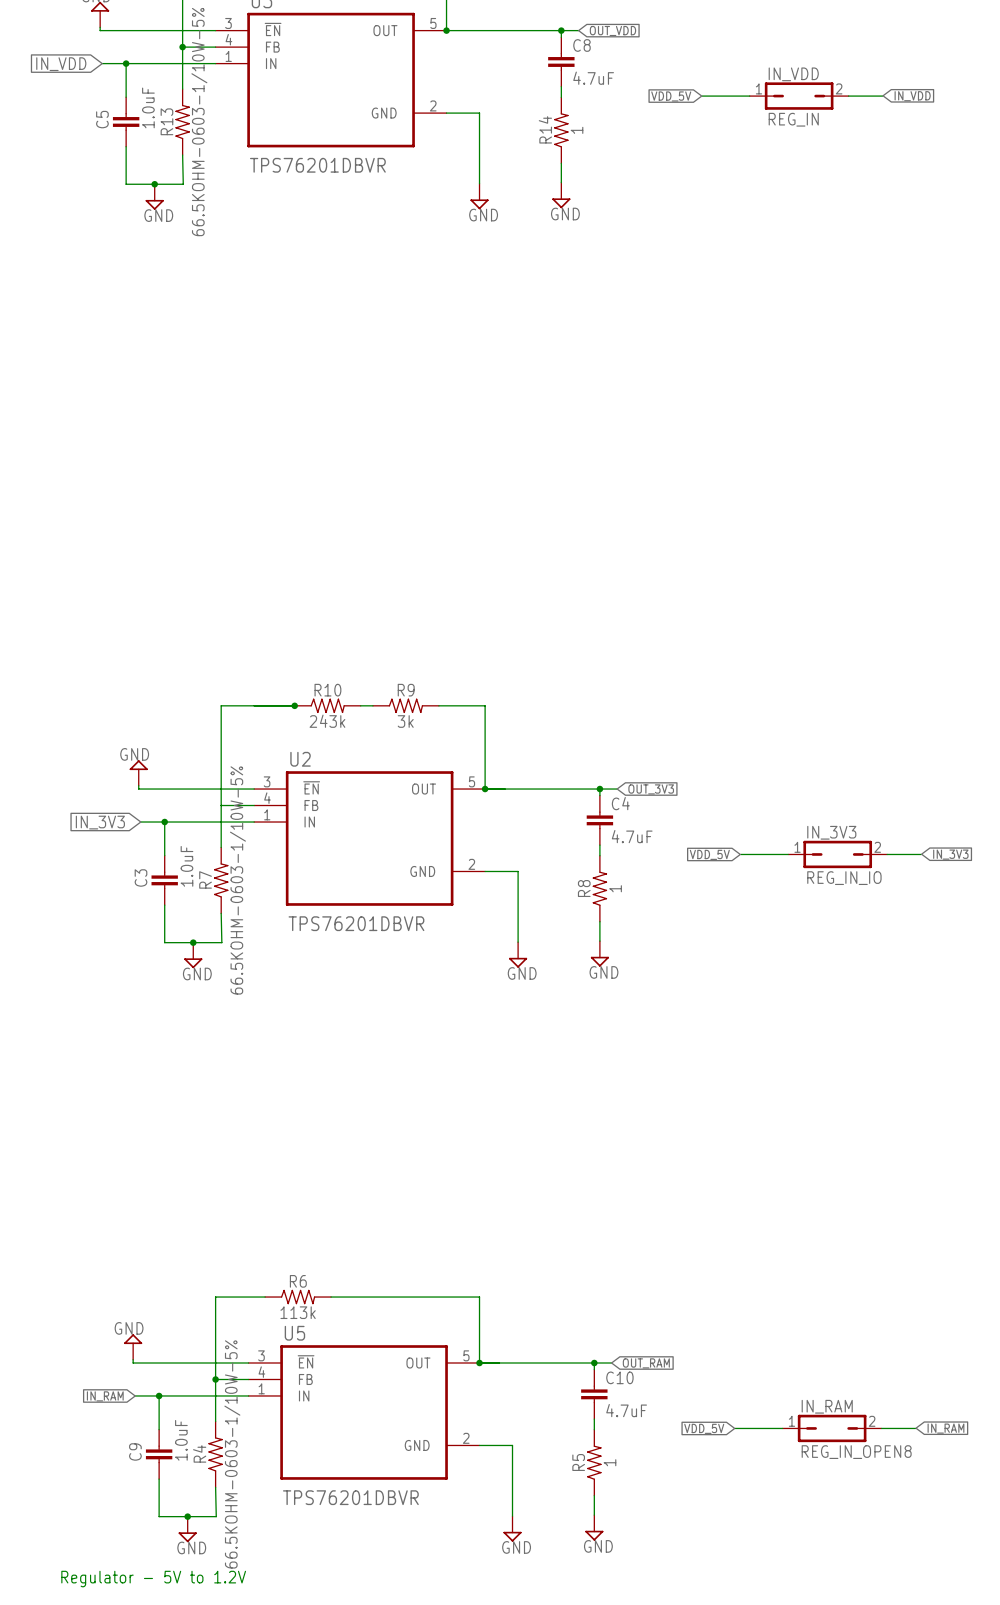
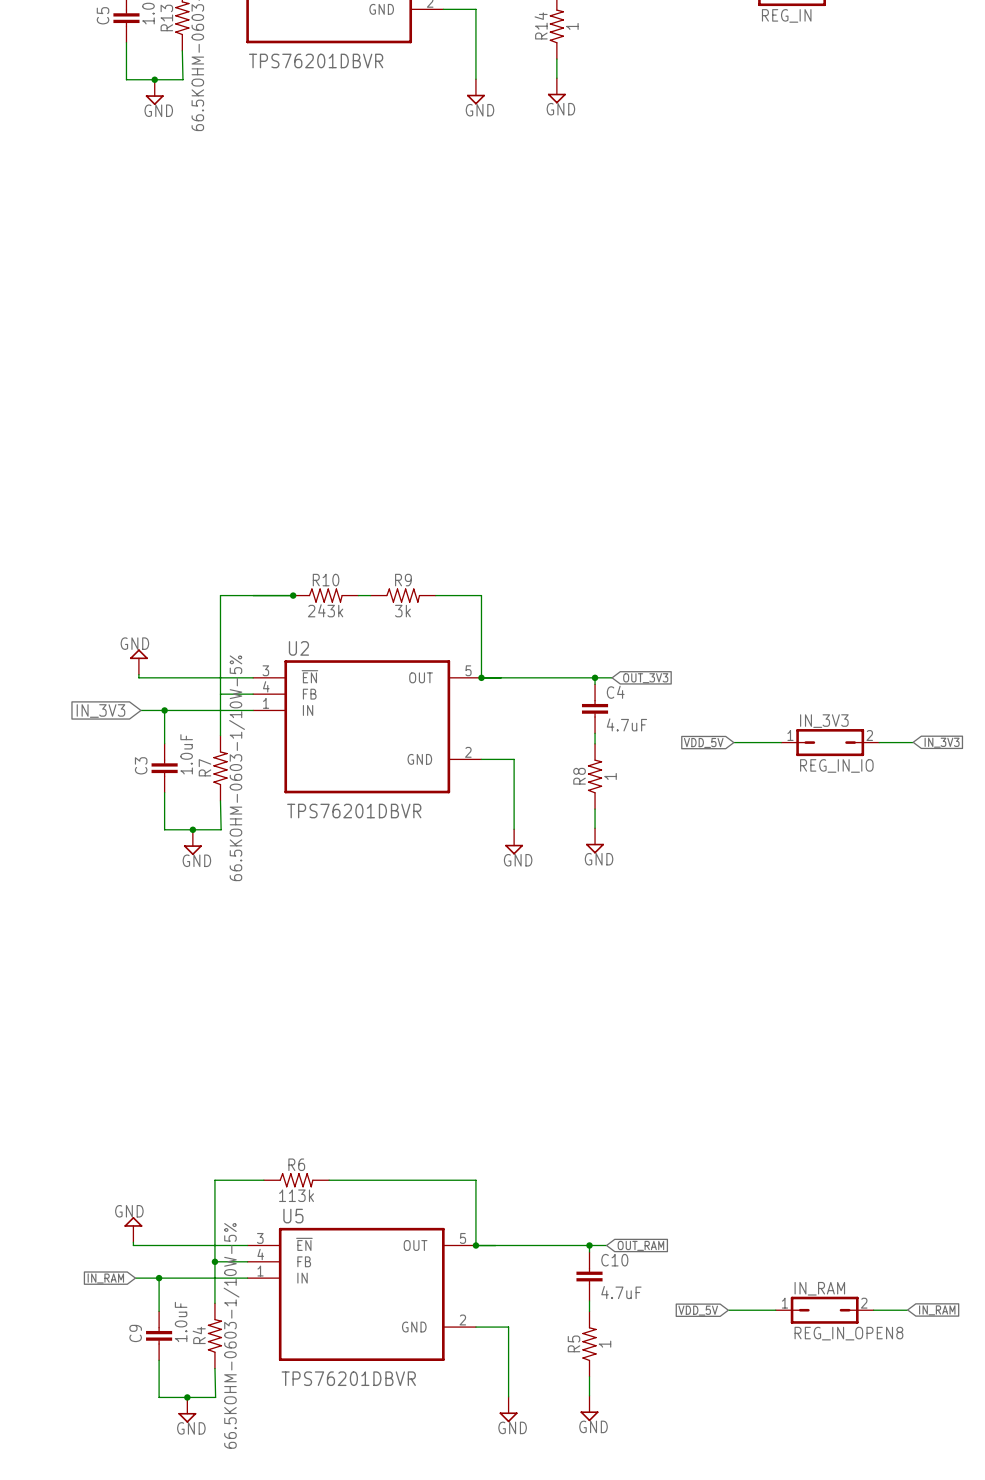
text: Regulator - 5V to 1.2V (153, 1579) -> none

